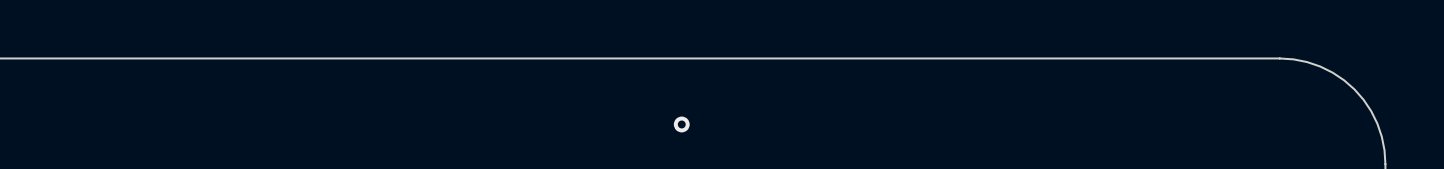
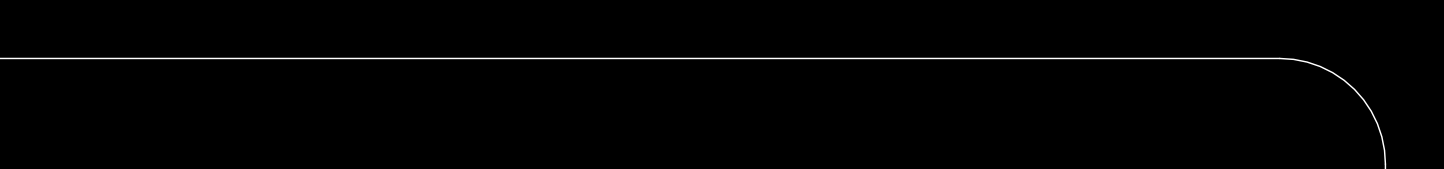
via: (681, 124) -> none

